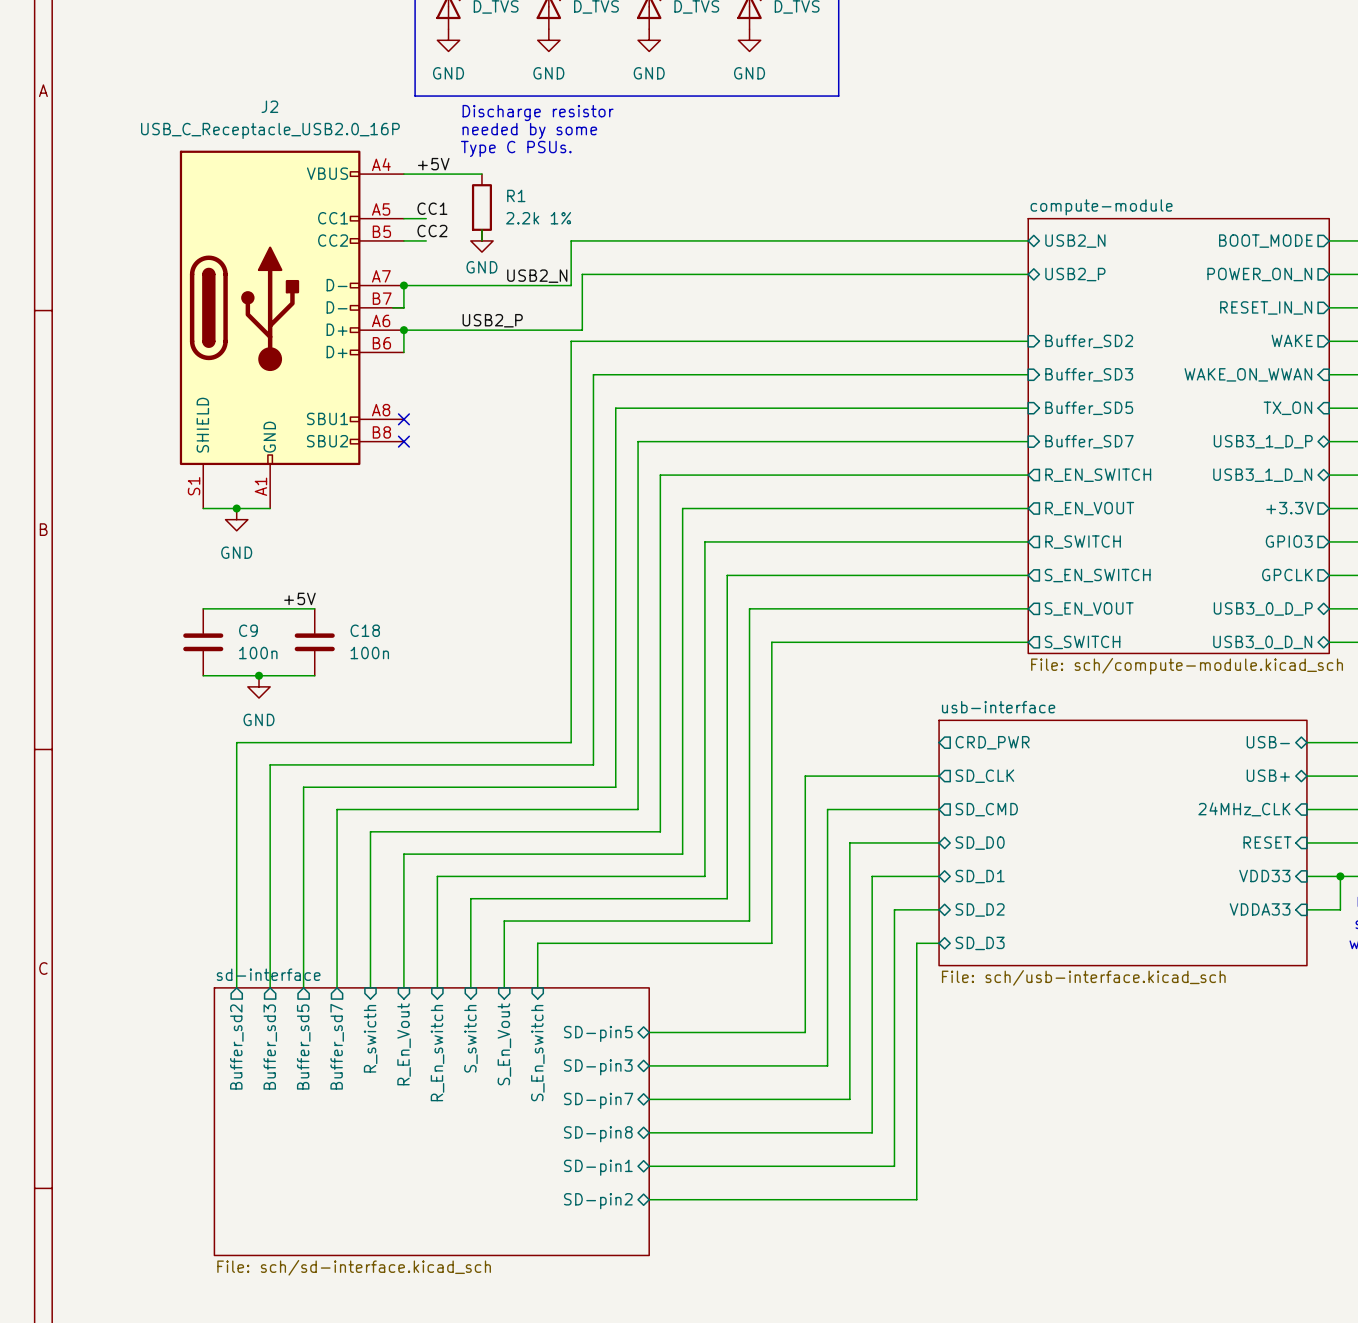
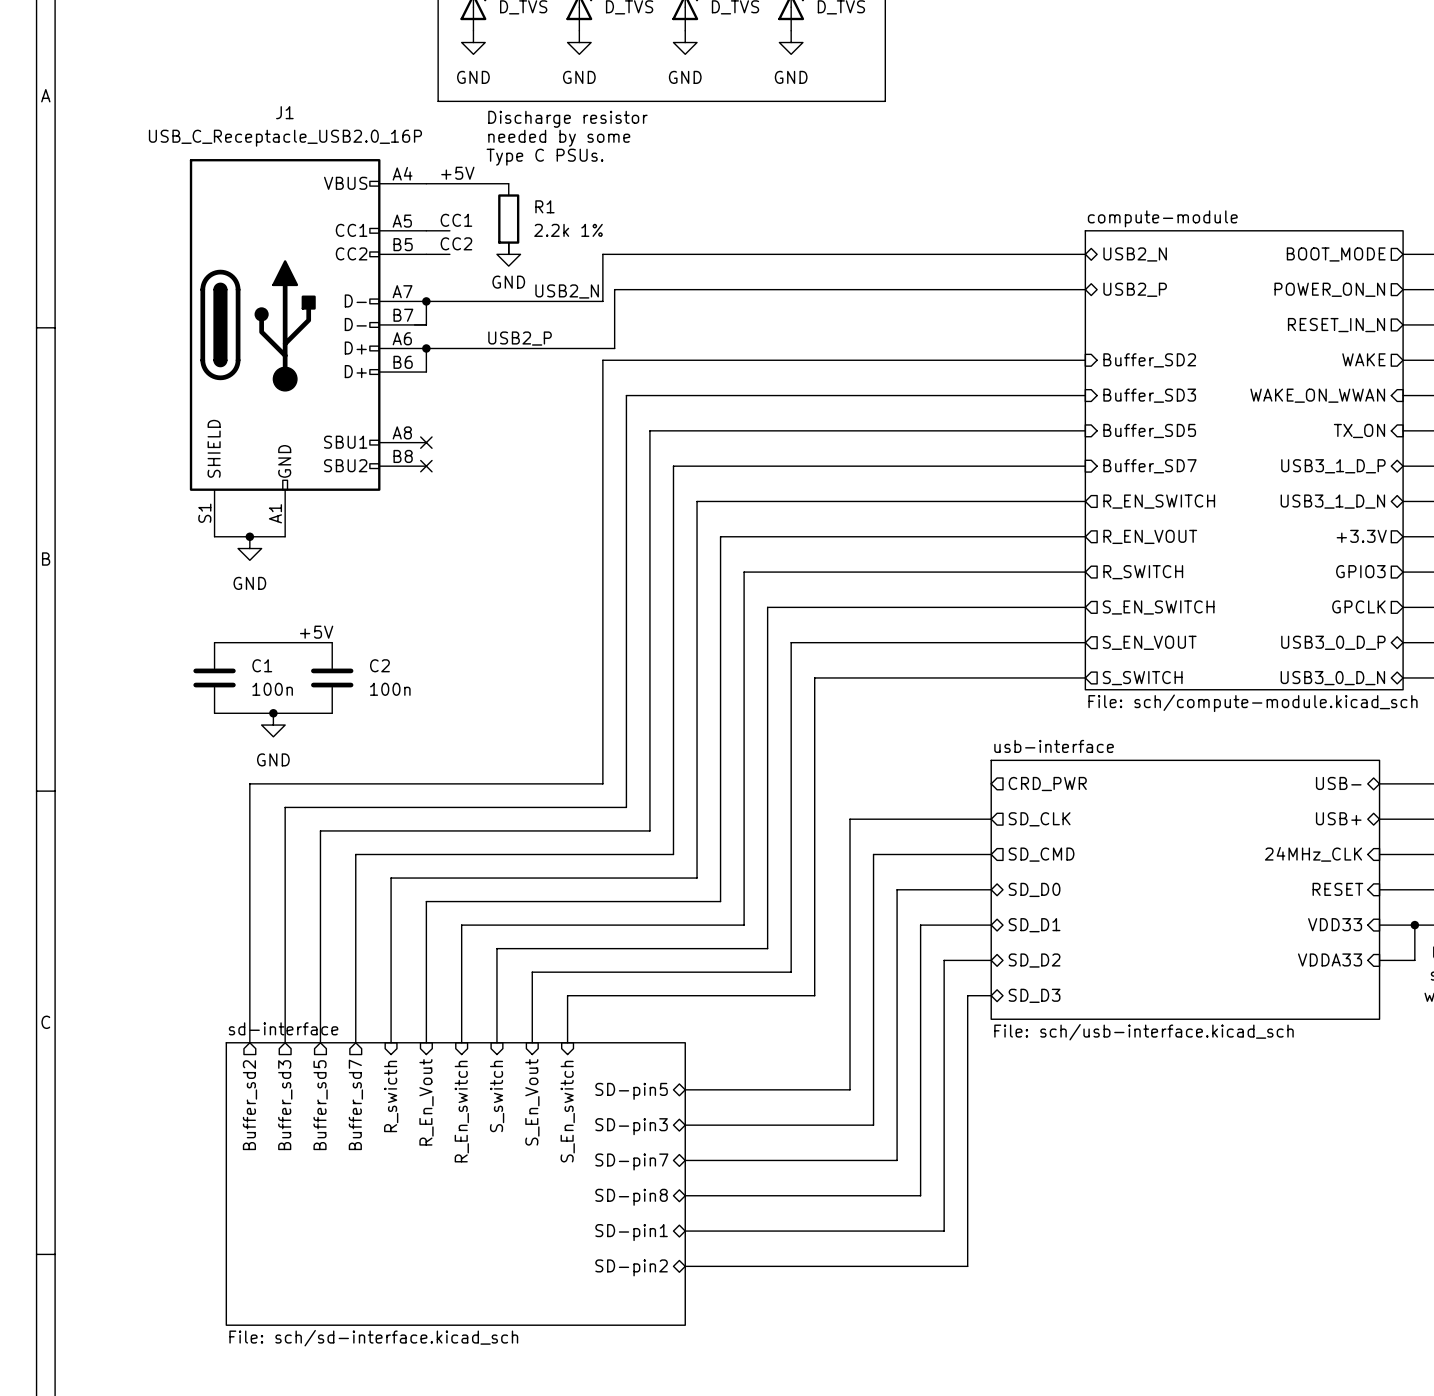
J2 name: J2 (269, 106) -> J1 (284, 112)
C9 name: C9 (248, 630) -> C1 (262, 665)
C18 name: C18 (365, 630) -> C2 (379, 665)

